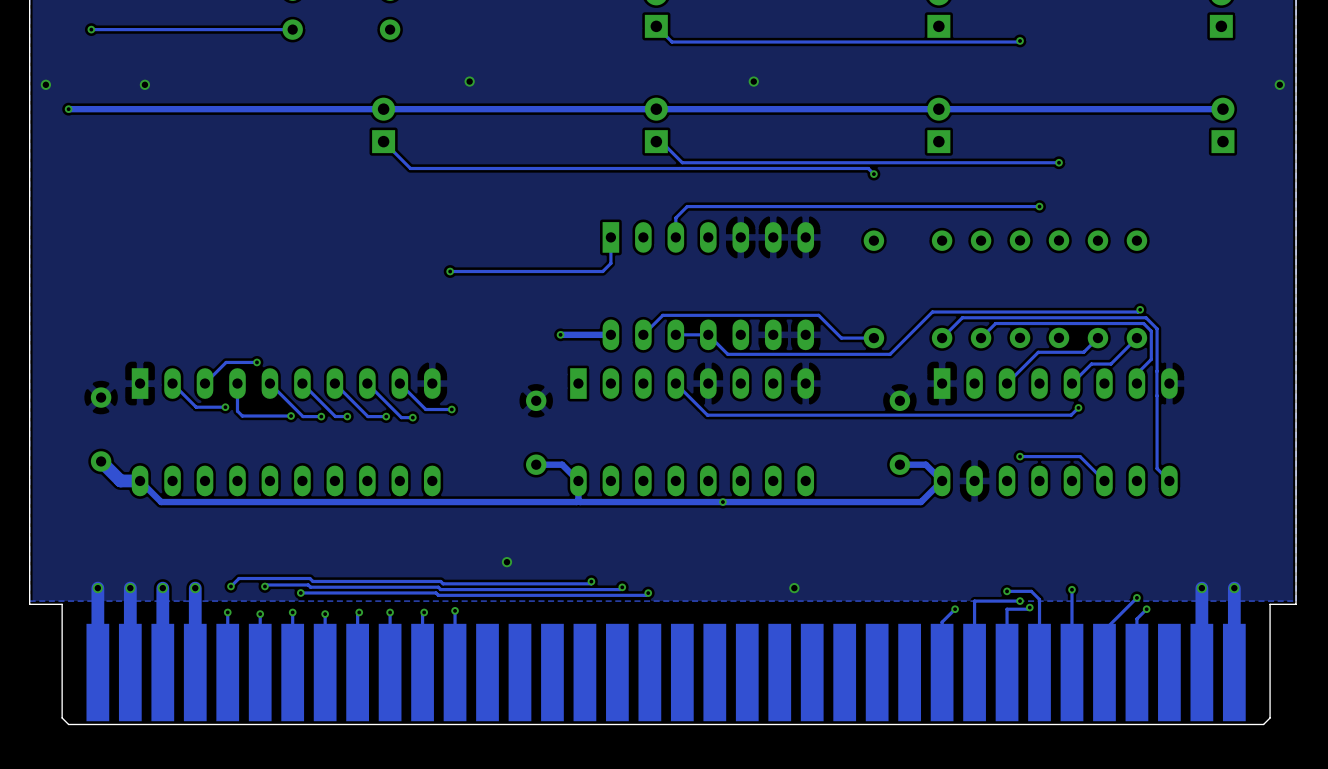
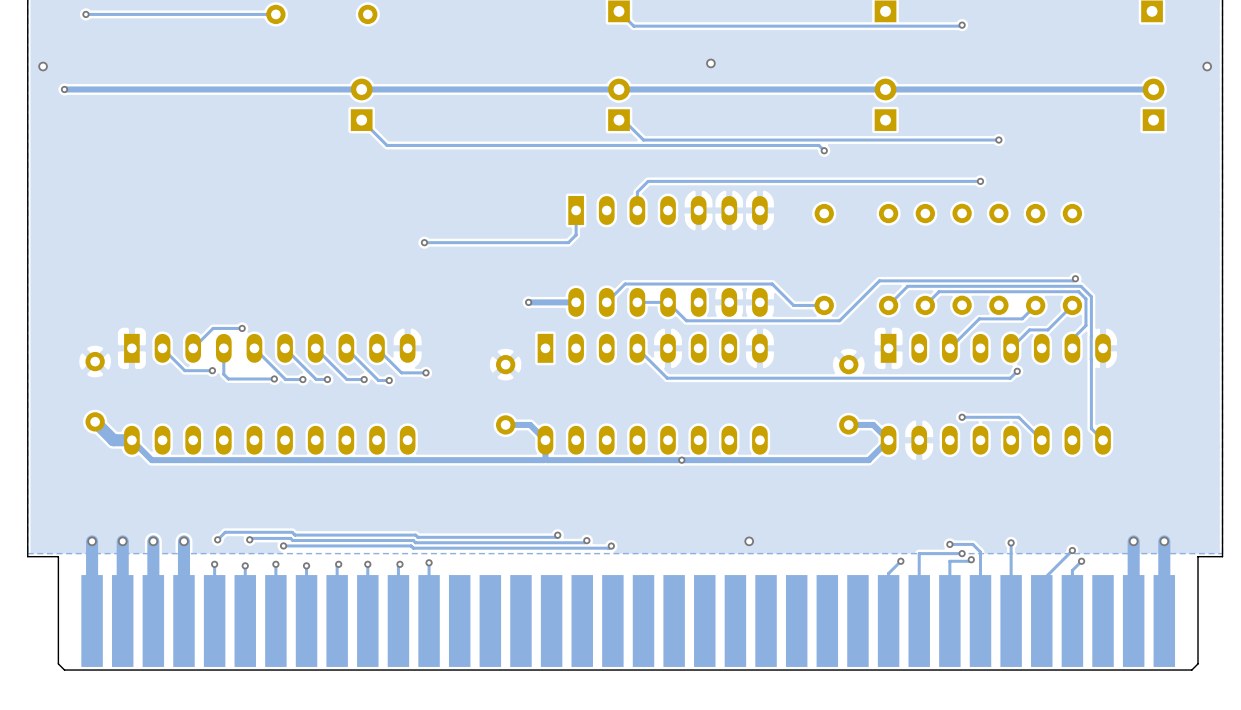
via: (469, 81) -> none
via: (144, 84) -> none
via: (506, 562) -> none

